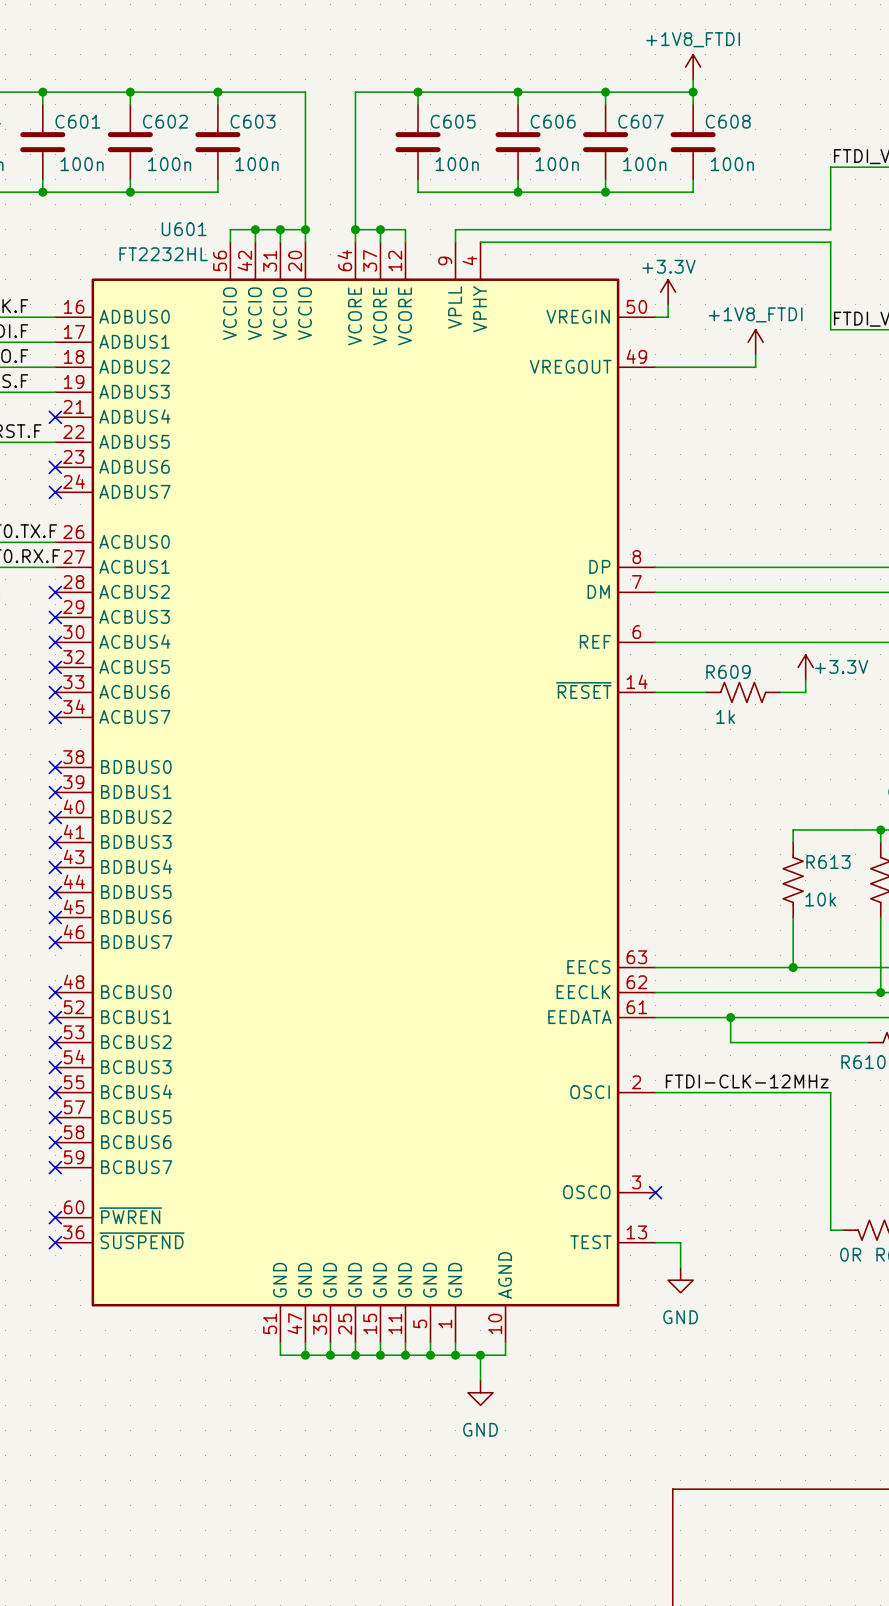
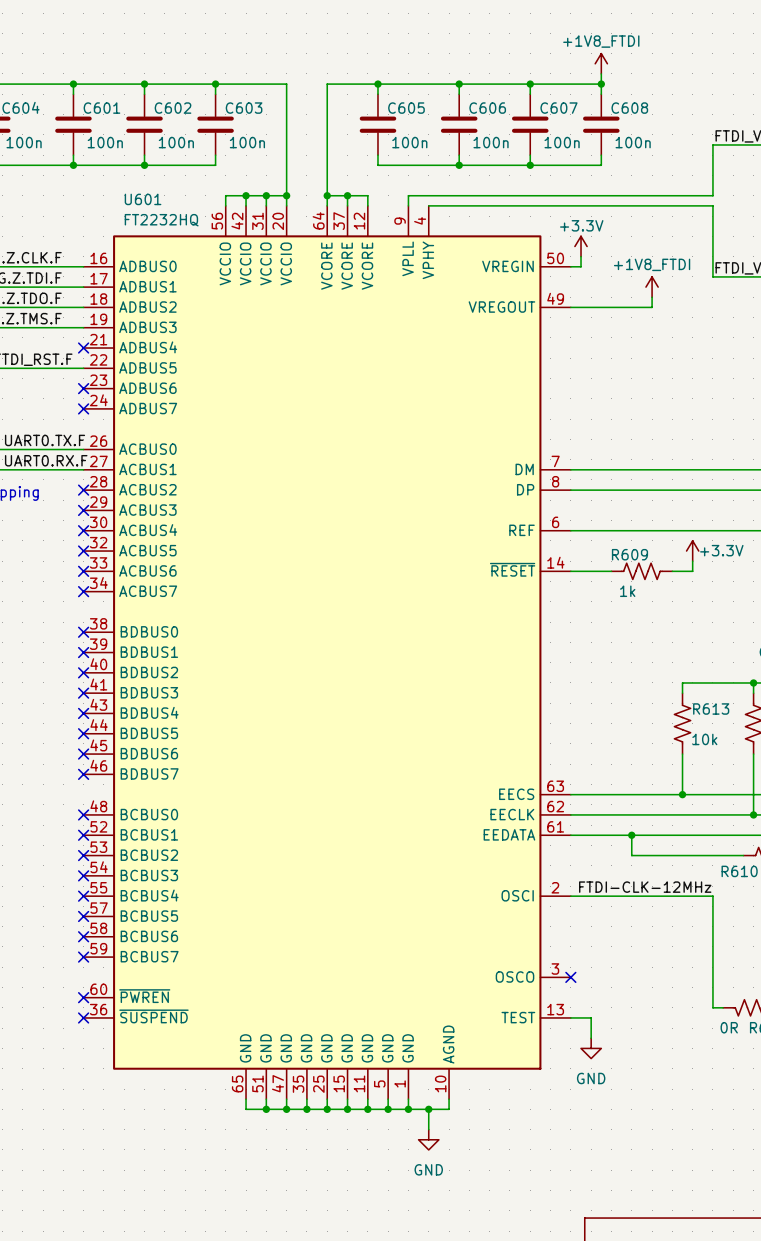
U601 name position: U601 (184, 229) -> U601 (143, 199)
U601 symbol: [55, 242, 656, 1343] -> [83, 205, 571, 1100]
U601 value: FT2232HL (163, 254) -> FT2232HQ (161, 220)
wire: none -> (246, 1099) (246, 1109) (266, 1109)
junction: none -> (266, 1109)

